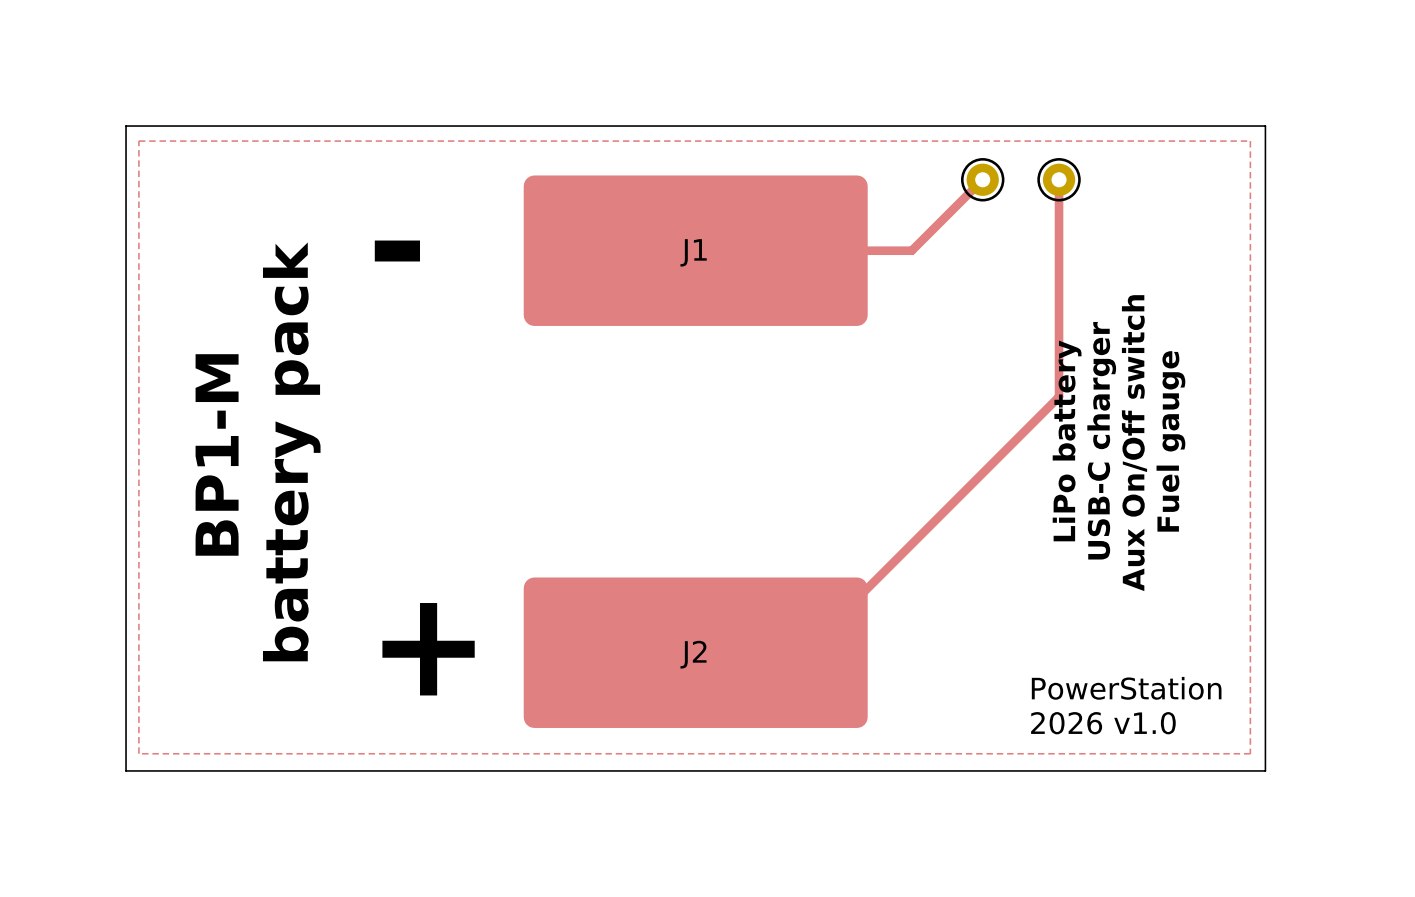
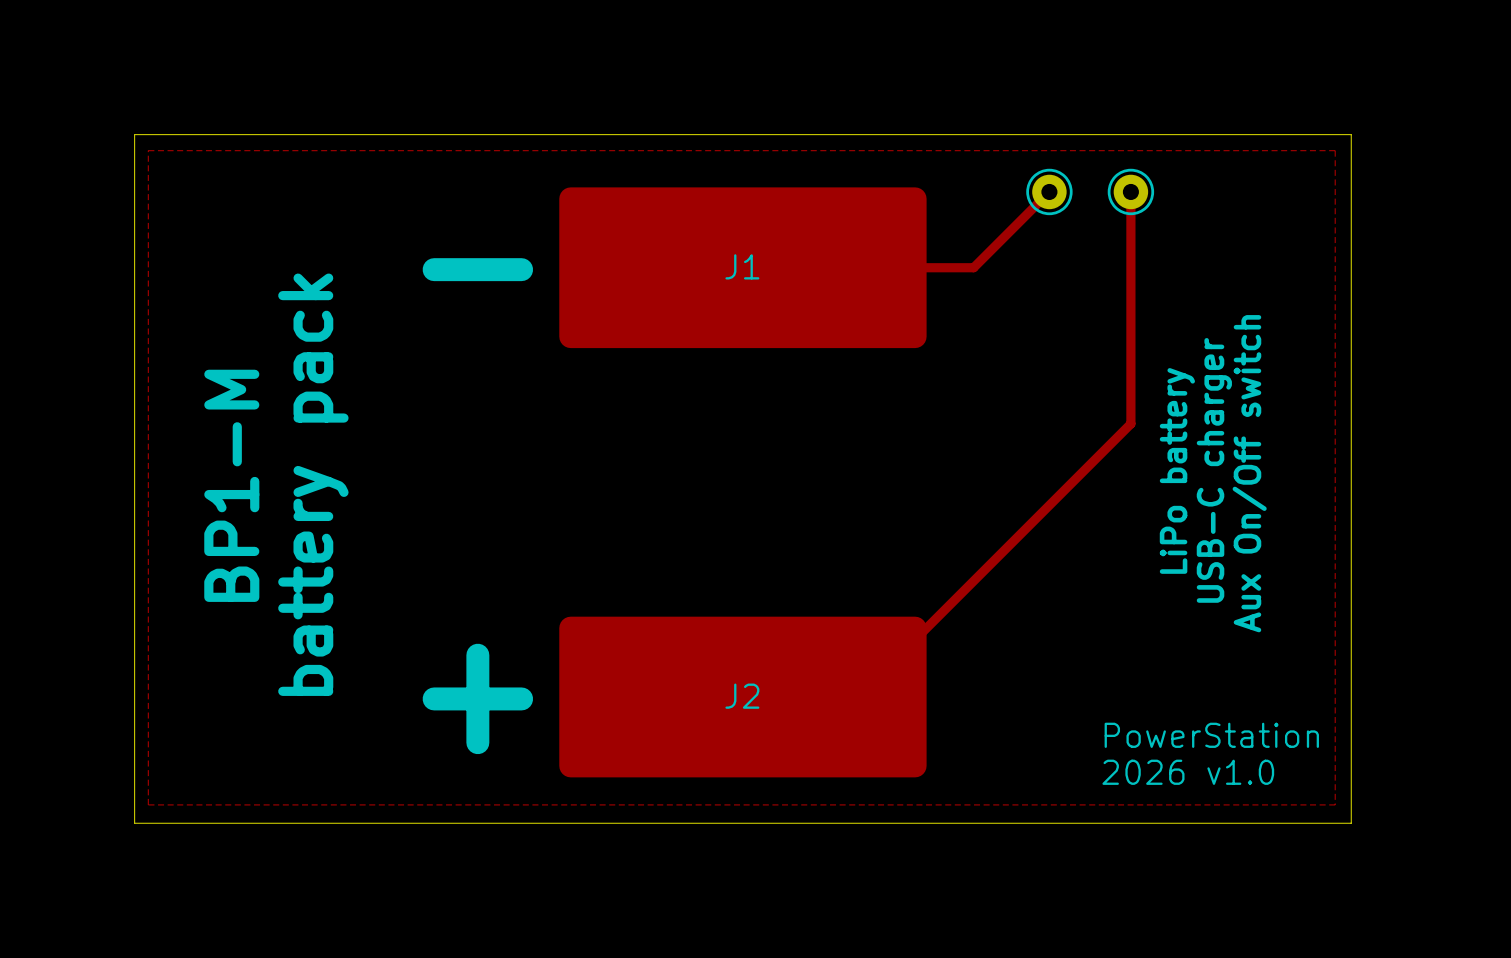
text: LiPo battery (1067, 440) -> none
text: USB-C charger (1101, 440) -> LiPo battery (1177, 470)
text: Fuel gauge (1170, 441) -> Aux On/Off switch (1249, 473)
text: Aux On/Off switch (1134, 443) -> USB-C charger (1214, 470)

